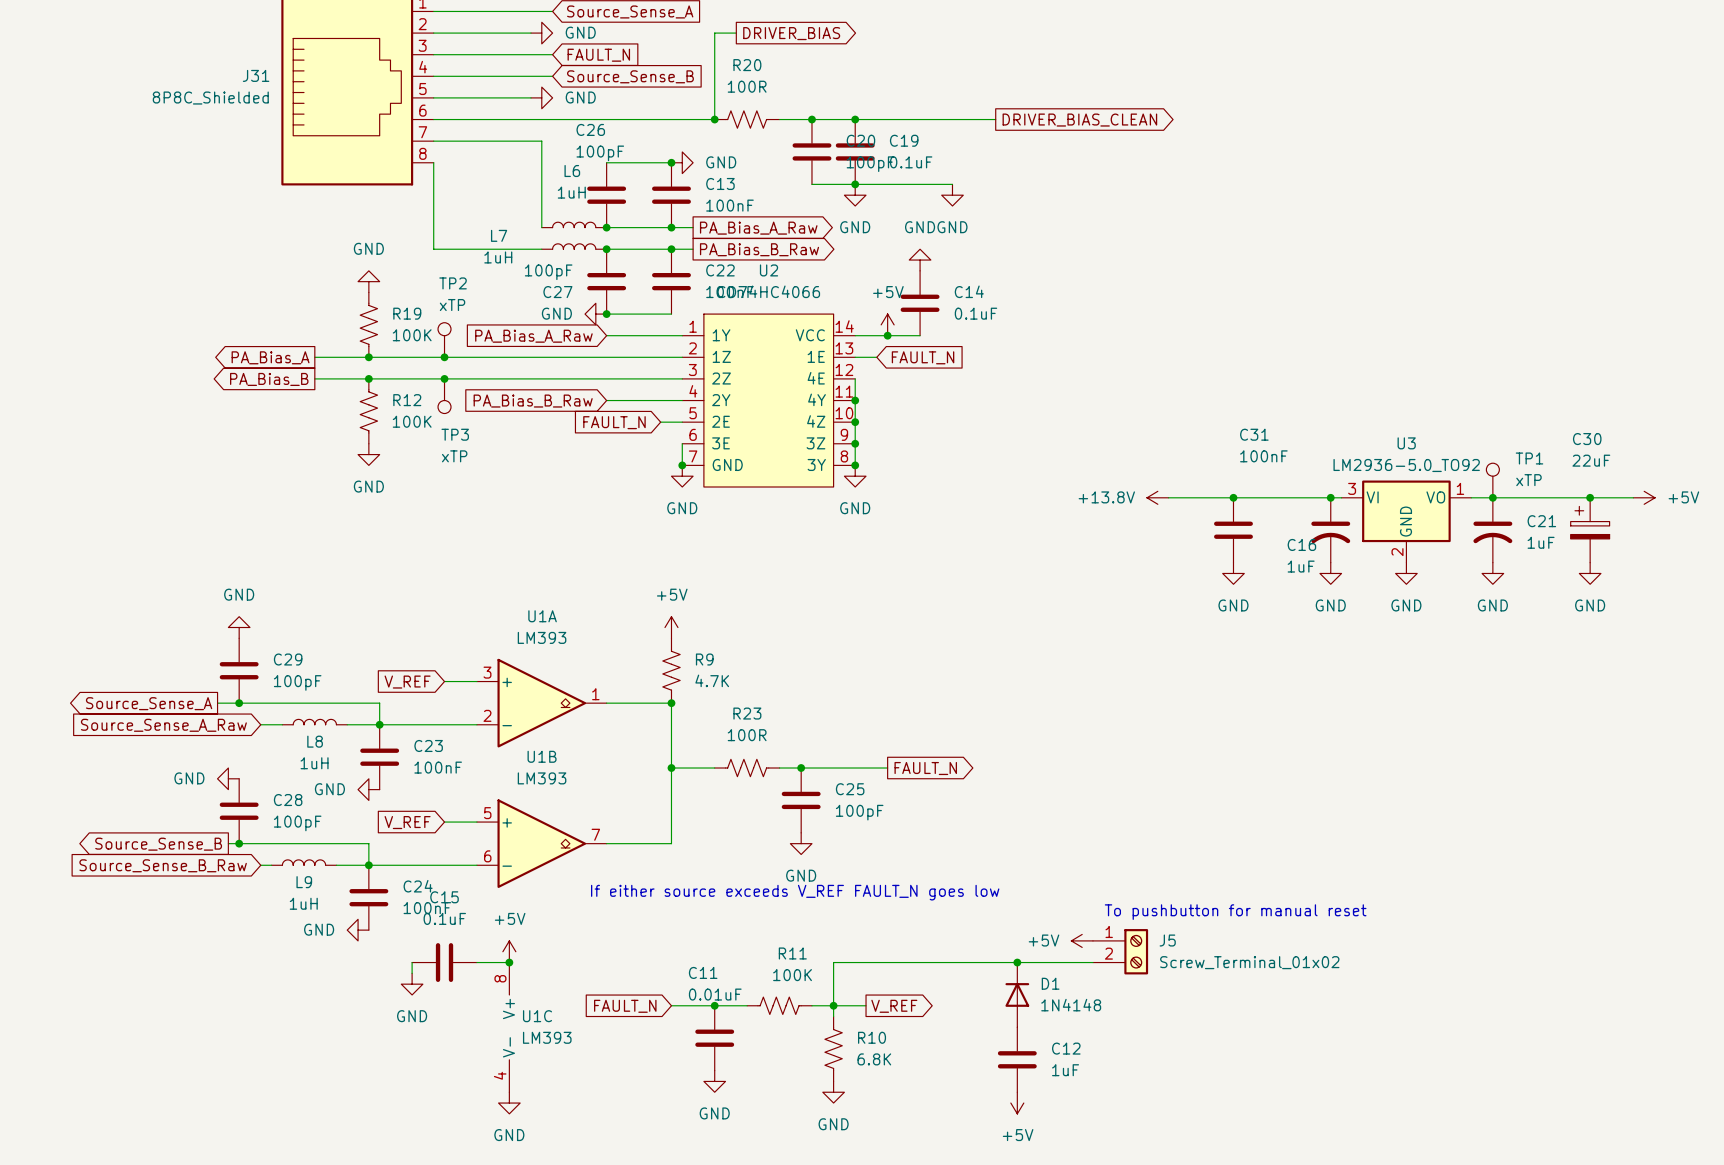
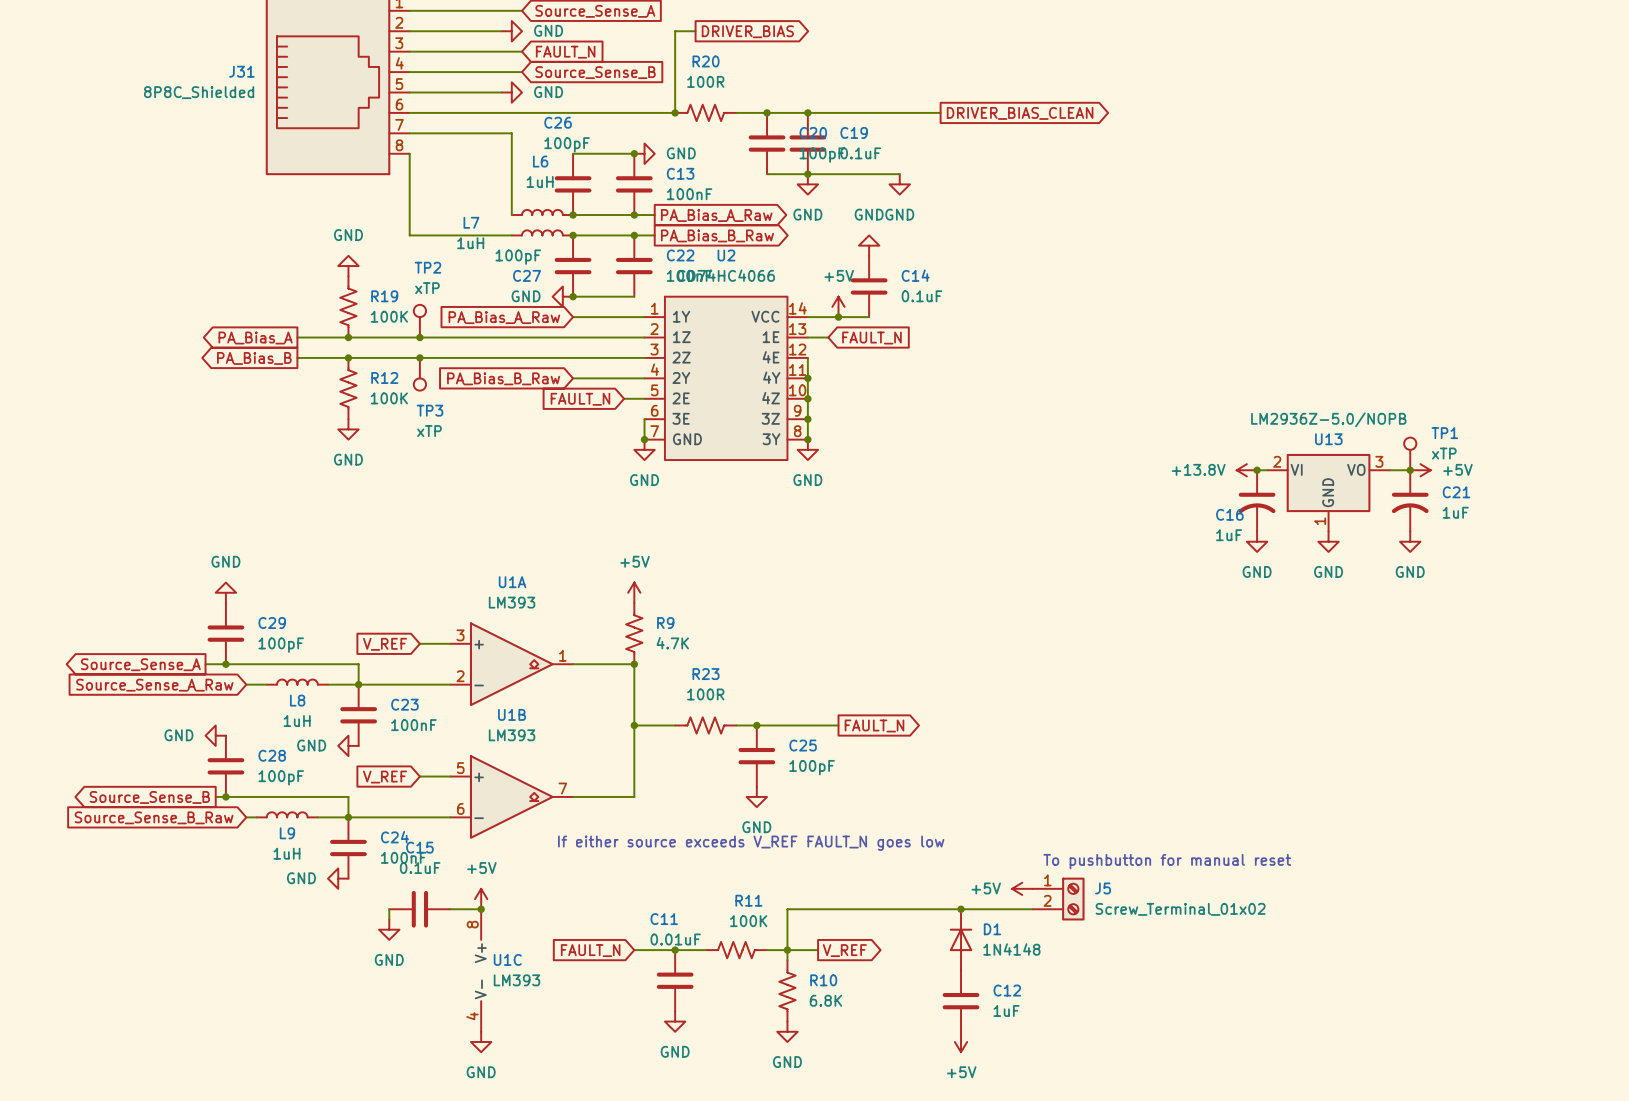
U3 name: U3 (1406, 443) -> U13 (1328, 439)
U3 value: LM2936-5.0_TO92 (1406, 465) -> LM2936Z-5.0/NOPB (1328, 419)
U3 pin number: 3 (1352, 488) -> 2 (1277, 461)
U3 pin number: 1 (1460, 488) -> 3 (1379, 461)
power symbol position: +13.8V (1157, 497) -> +13.8V (1246, 470)
wire: (1168, 497) (1330, 497) -> none
junction: (1233, 497) -> none
wire: (1492, 497) (1633, 497) -> none
junction: (1590, 497) -> none
power symbol position: +5V (1644, 497) -> +5V (1420, 470)
C31: 100nF (1233, 530) -> none
C30: 22uF (1590, 530) -> none
U3 pin number: 2 (1397, 552) -> 1 (1320, 521)
power symbol: GND (1233, 573) -> none
power symbol: GND (1590, 573) -> none

